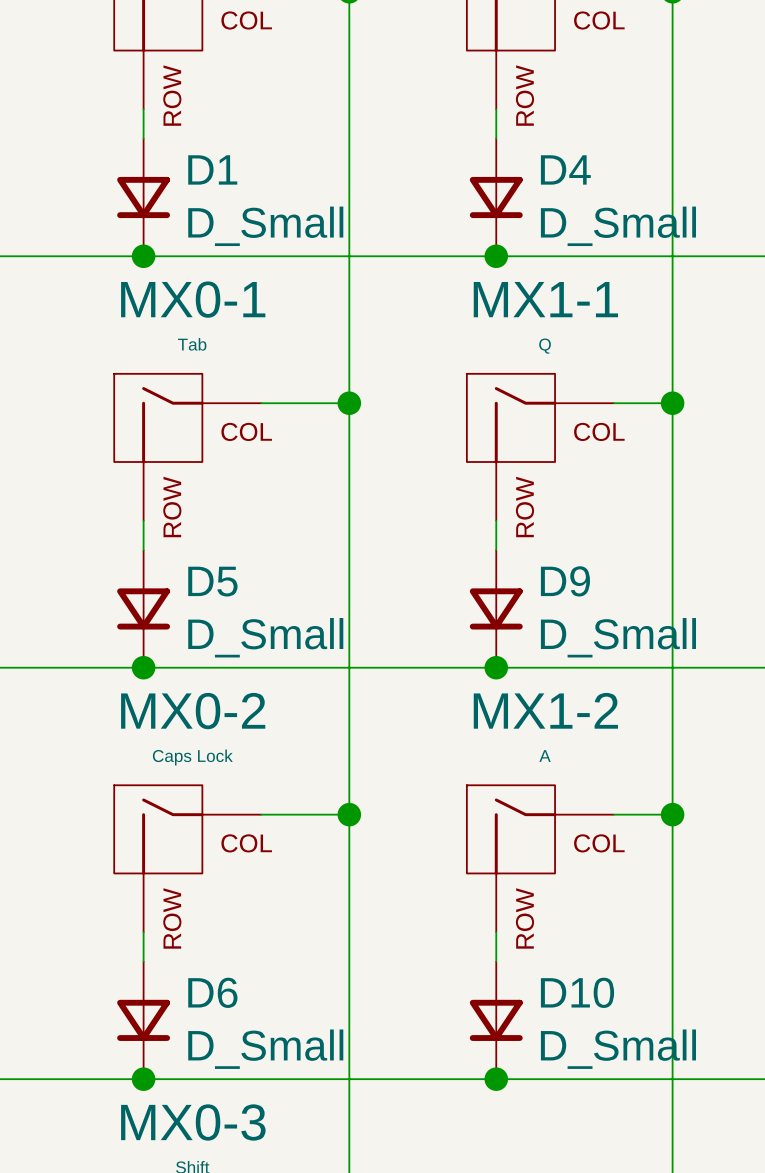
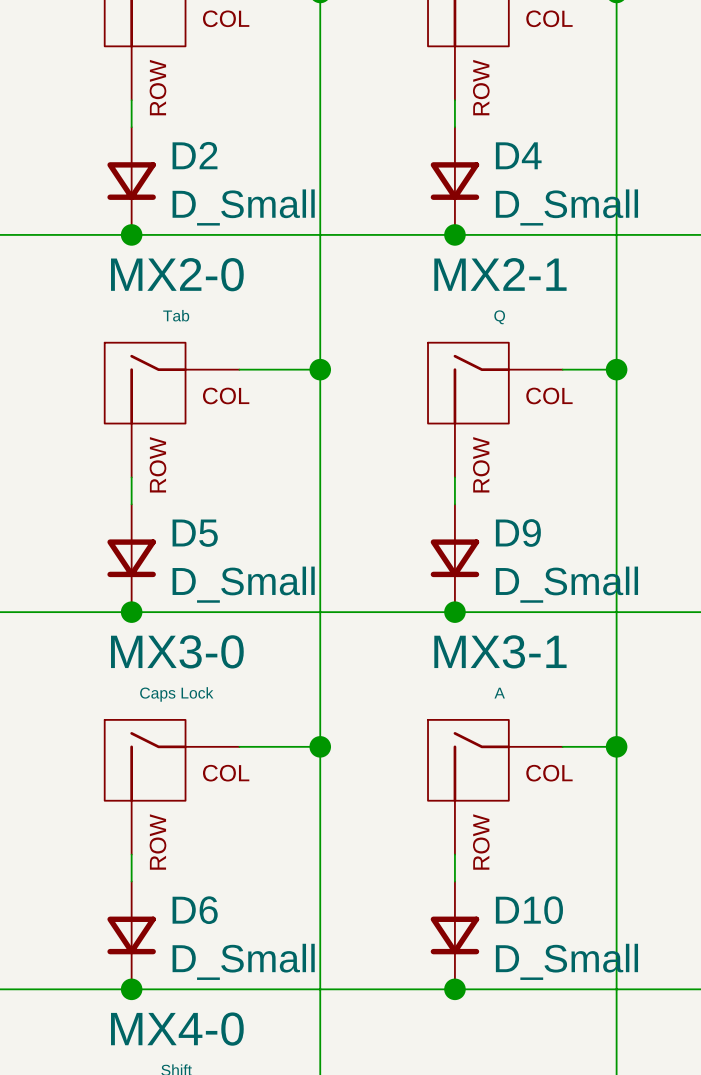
D1 name: D1 (212, 169) -> D2 (195, 155)
MX0-1 name: MX0-1 (193, 299) -> MX2-0 (177, 274)
MX1-1 name: MX1-1 (545, 299) -> MX2-1 (500, 274)
MX1-2 name: MX1-2 (545, 710) -> MX3-1 (500, 651)
MX0-2 name: MX0-2 (193, 711) -> MX3-0 (177, 651)
MX0-3 name: MX0-3 (193, 1122) -> MX4-0 (177, 1029)

